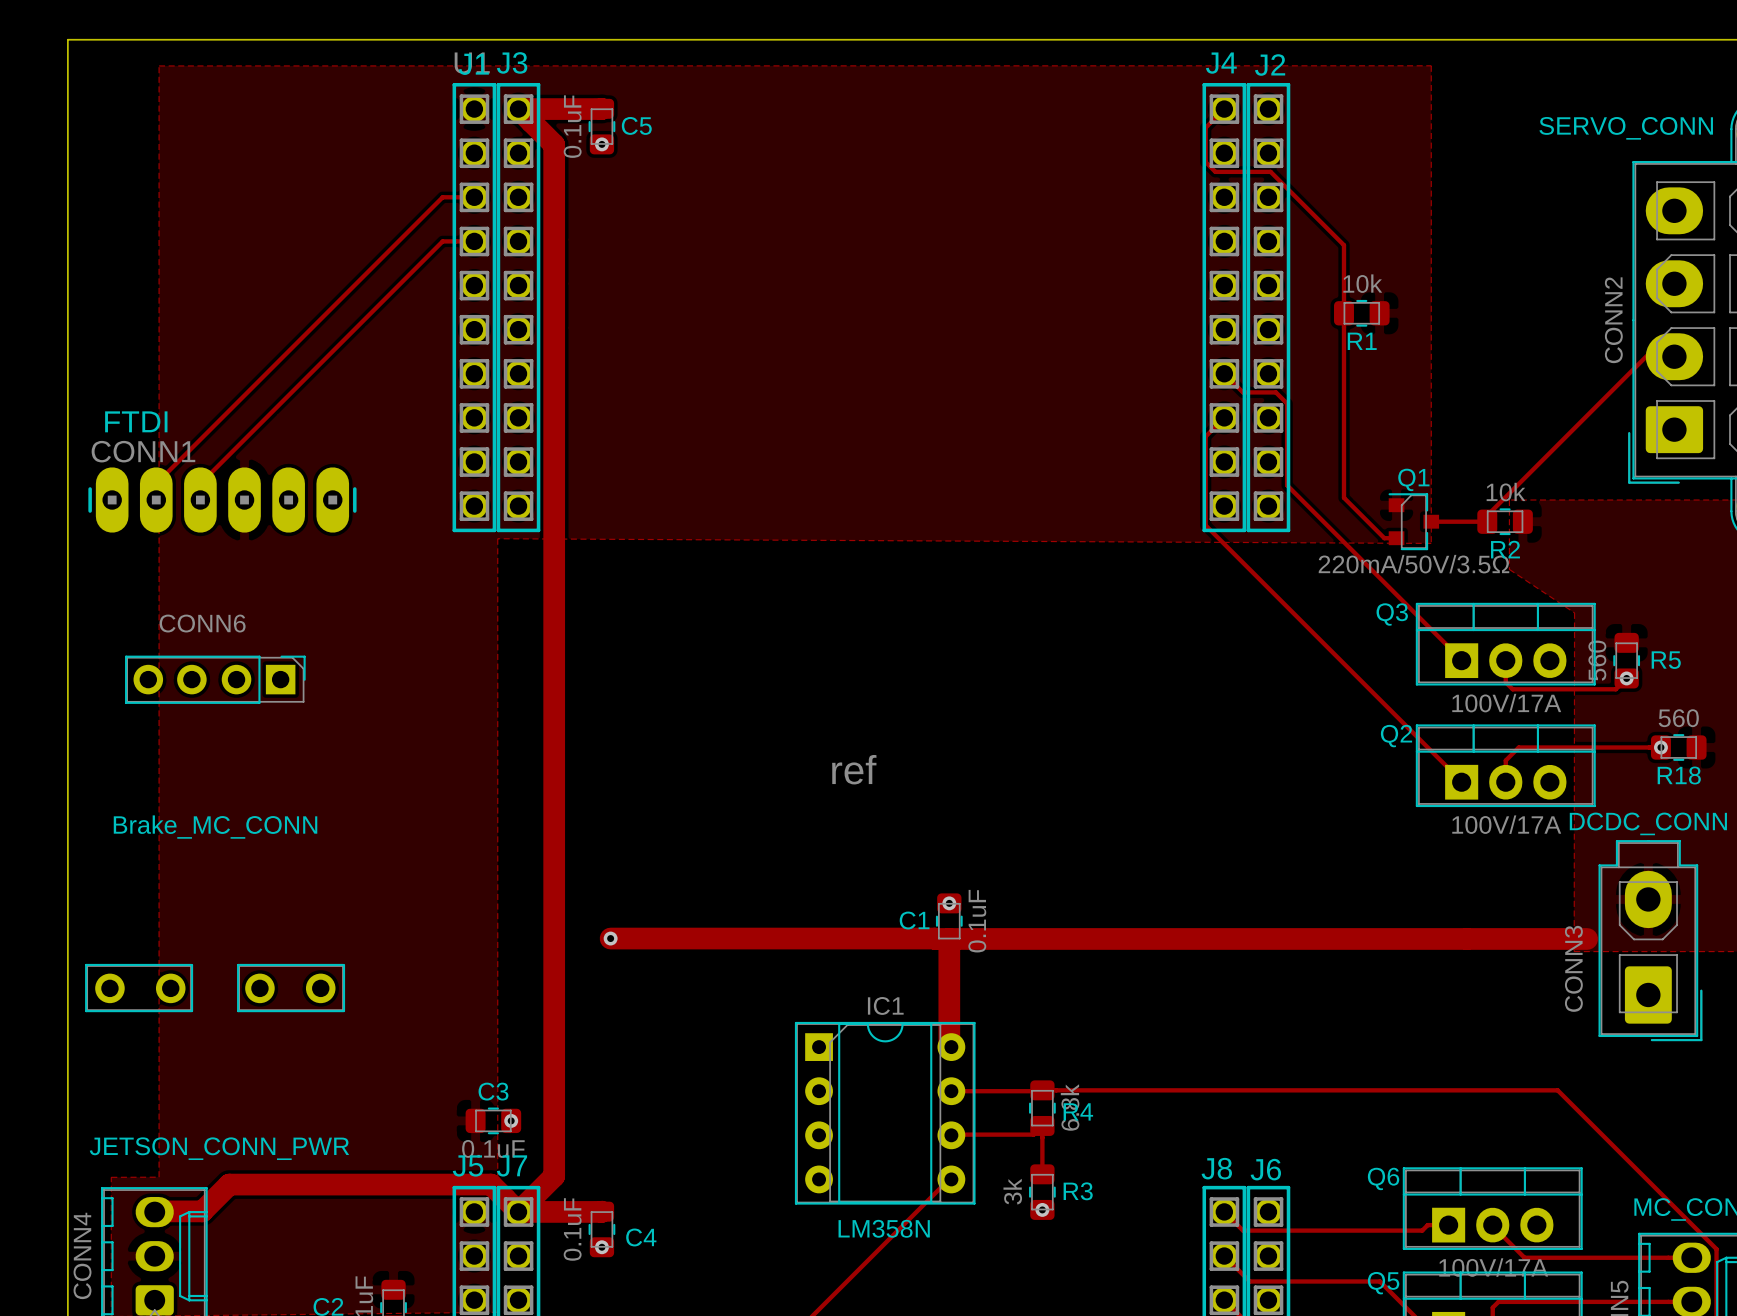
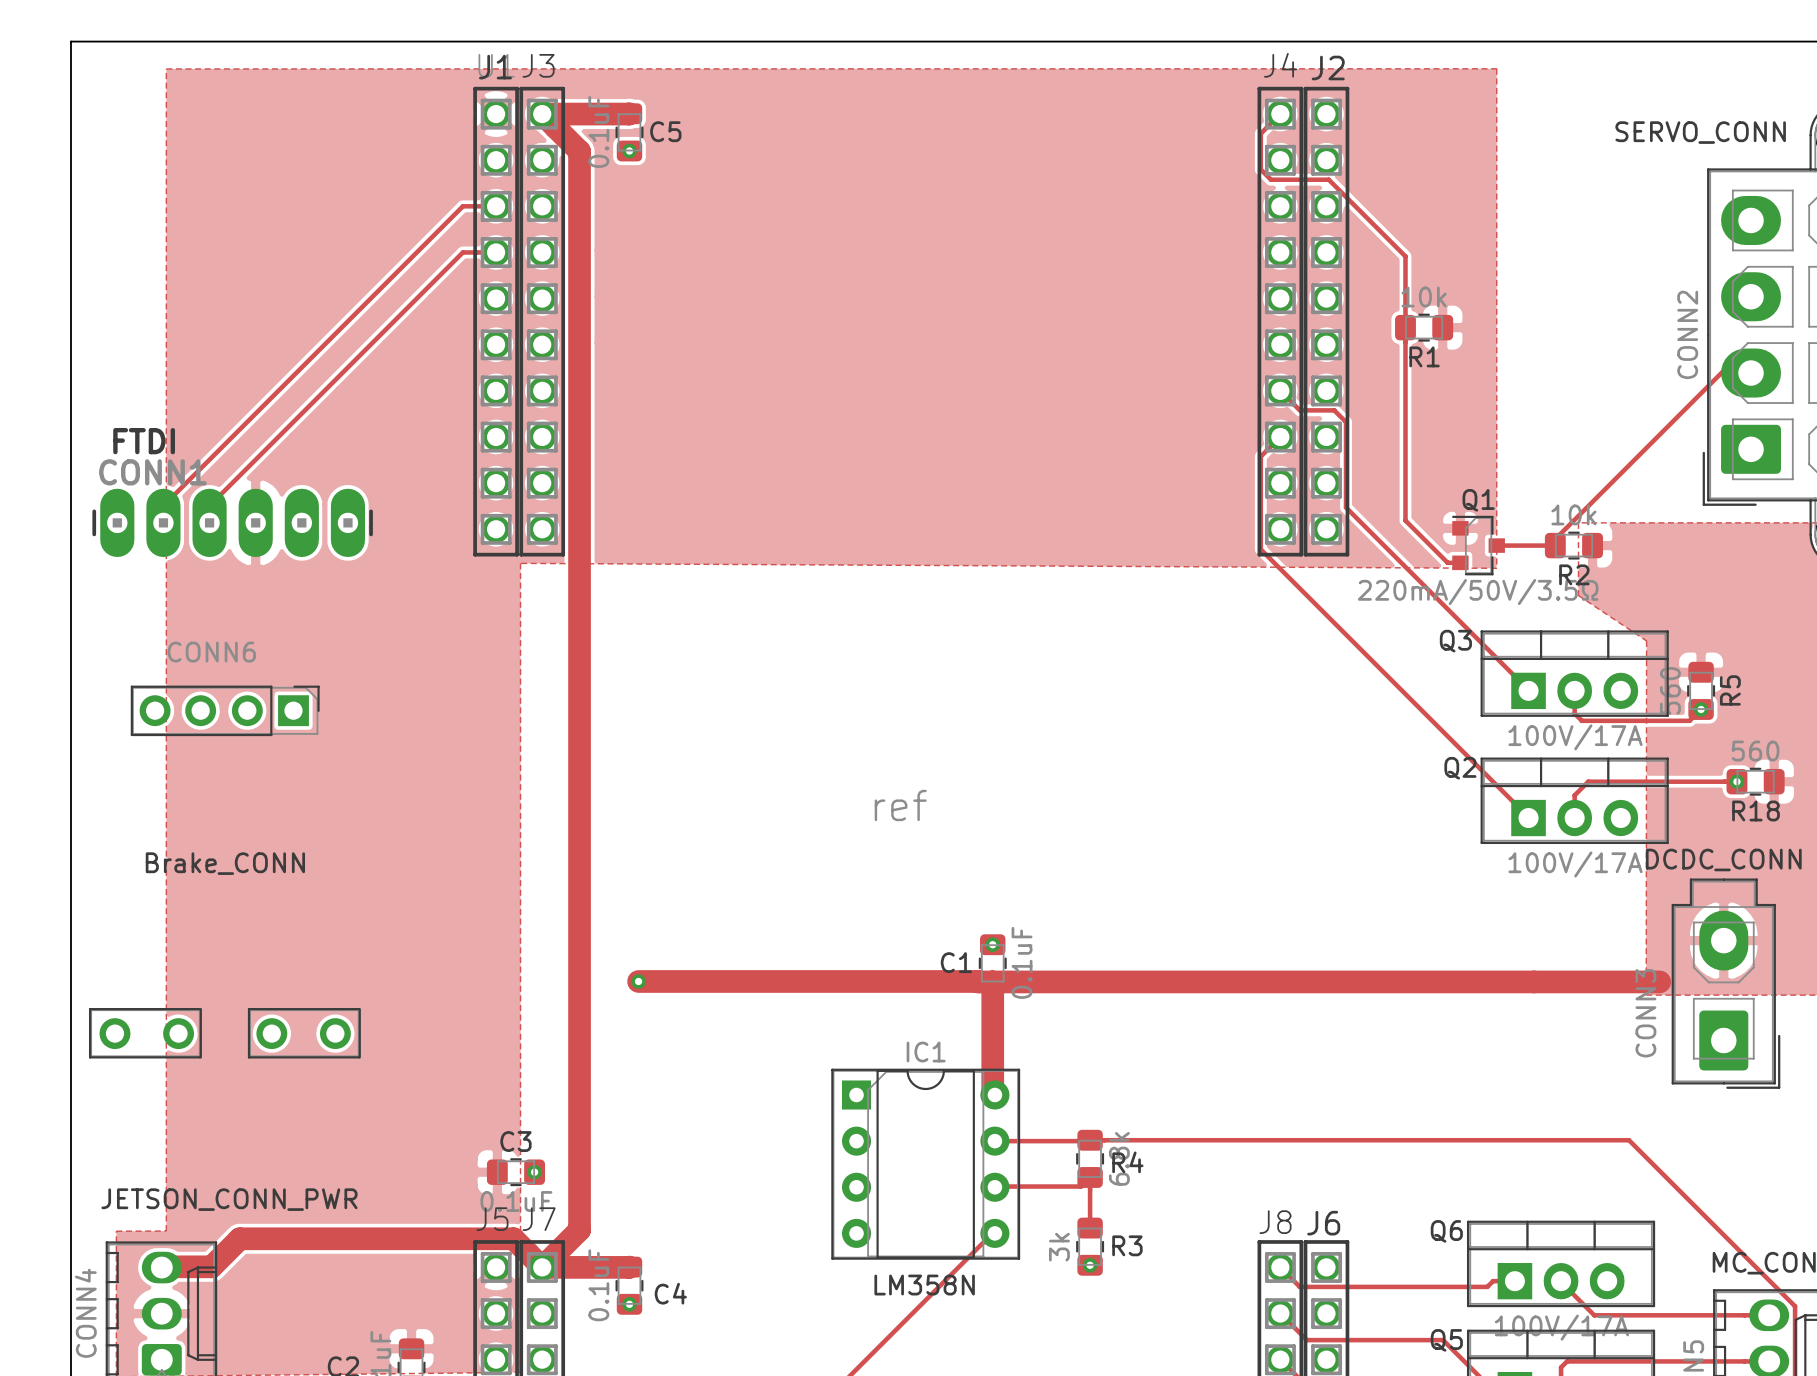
R5 name rotation: 0° (1666, 660) -> 90° counterclockwise (1730, 690)
CONN6 value: Brake_MC_CONN (215, 827) -> Brake_CONN (225, 863)

